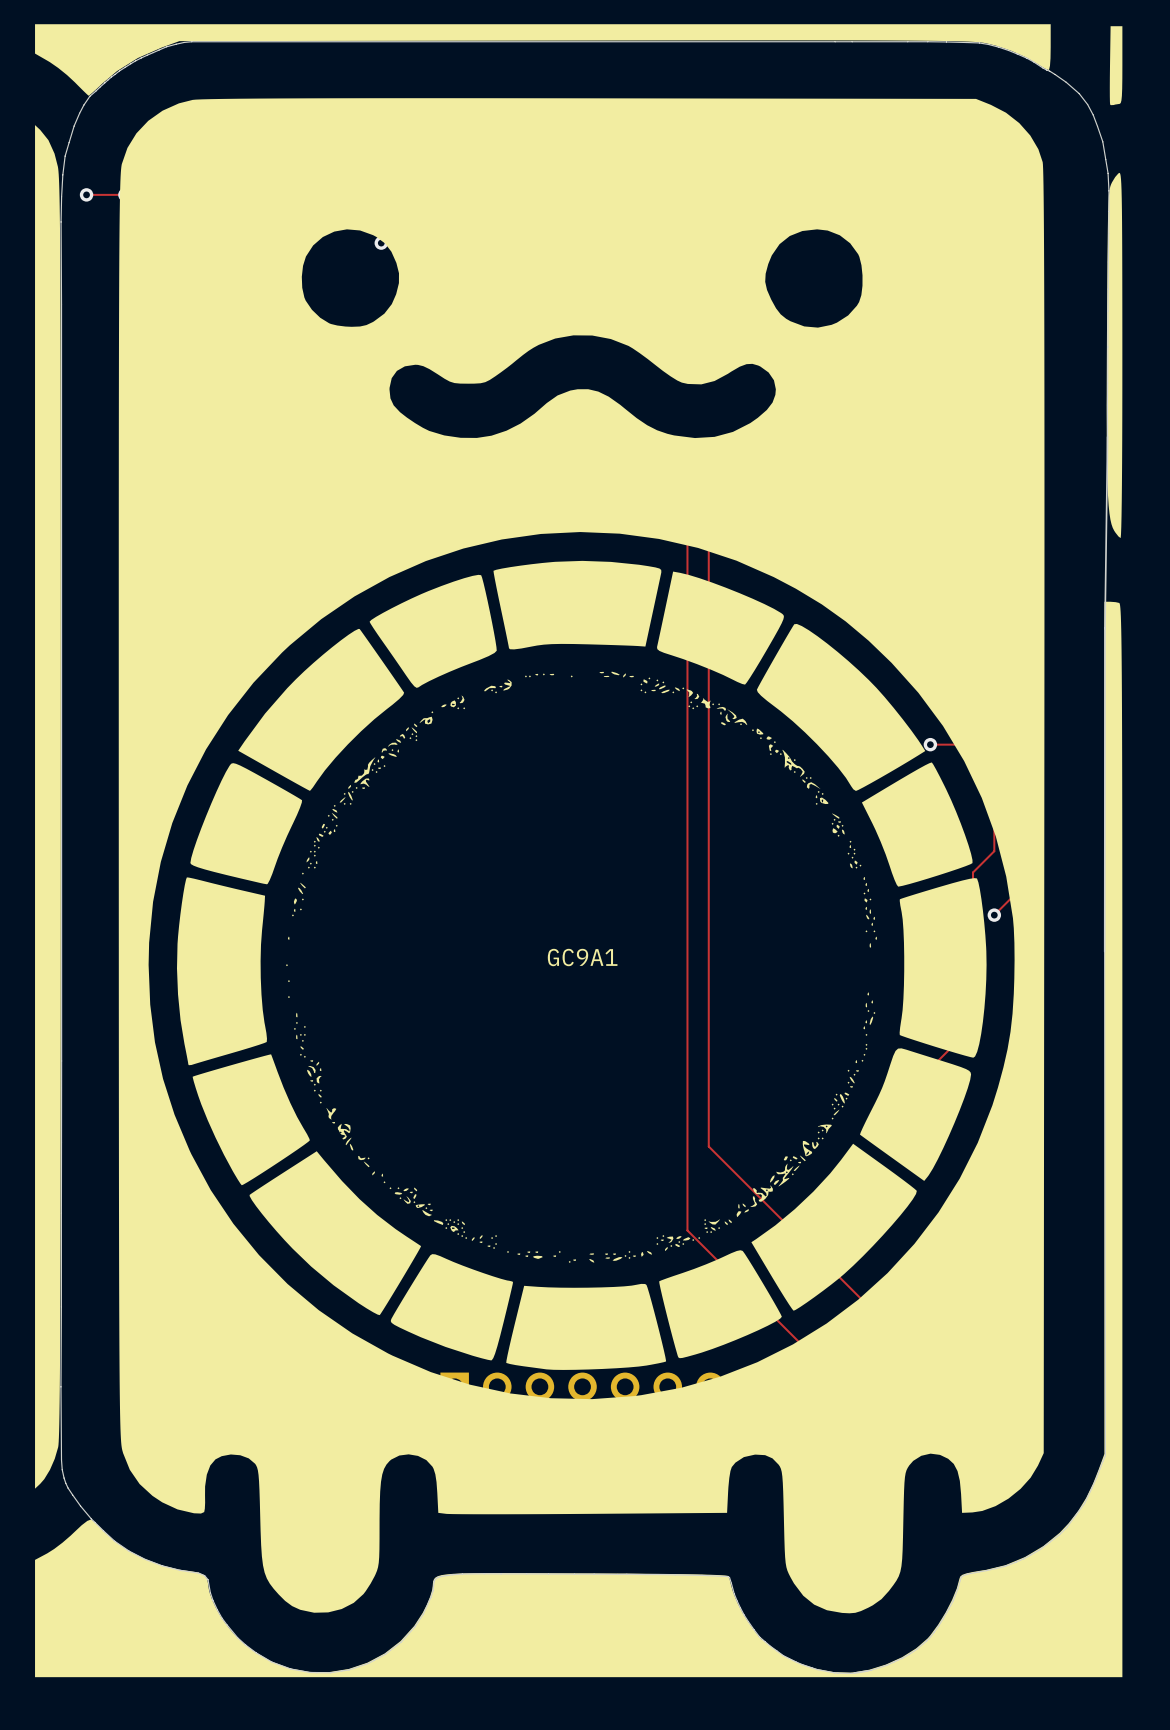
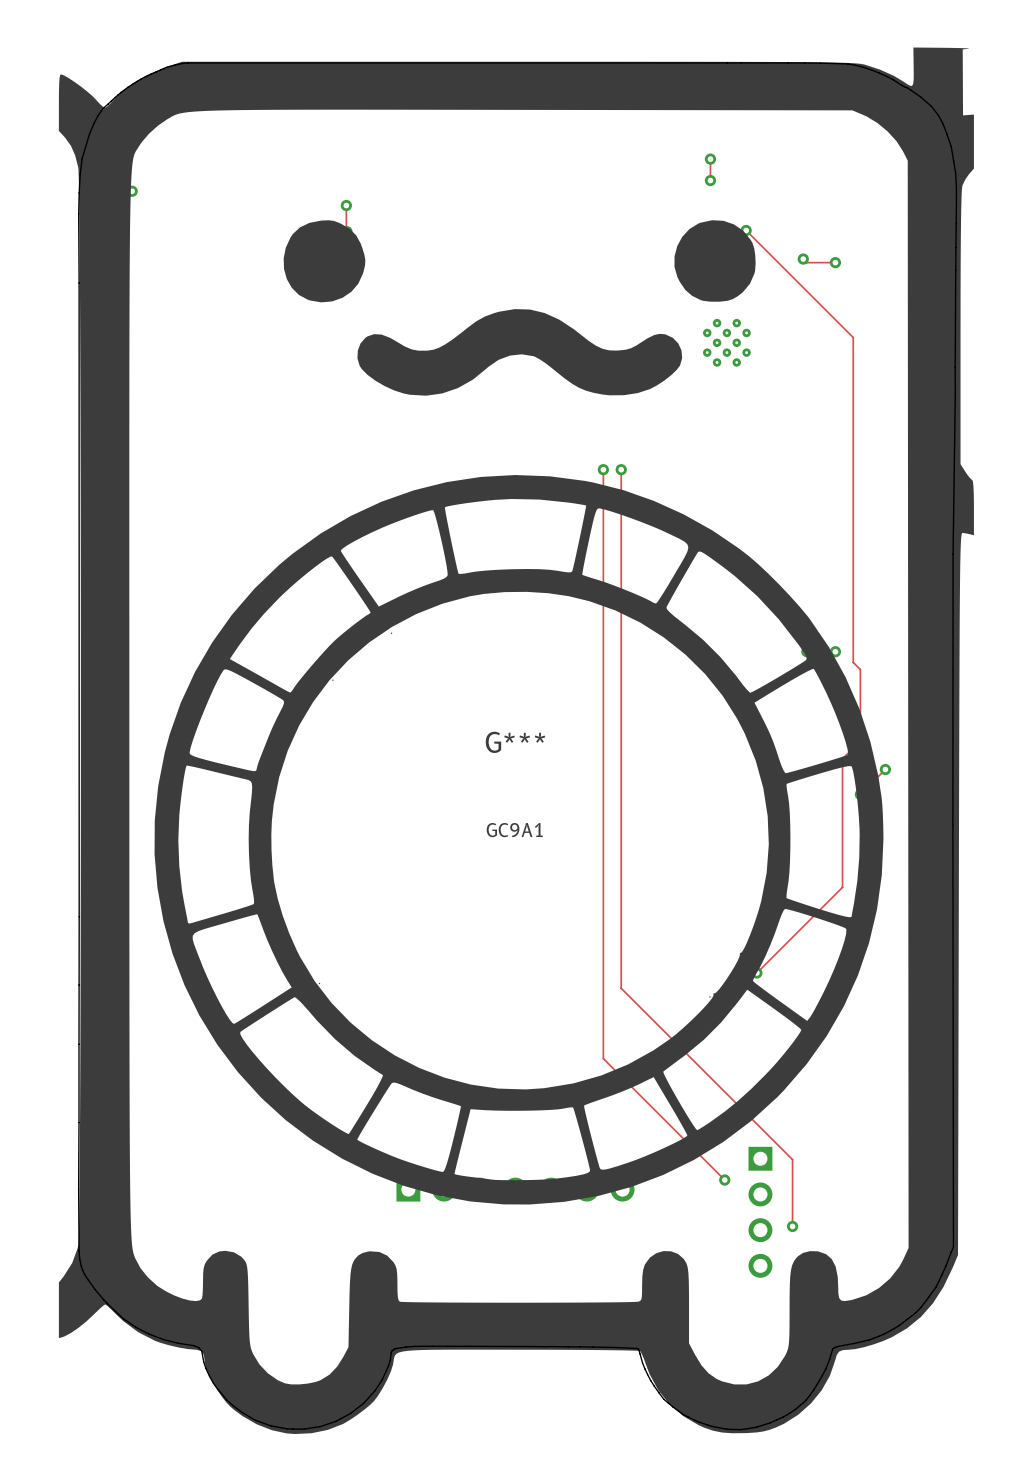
drawing: [35, 24, 1123, 1678] -> none
G***: none -> (516, 740)

